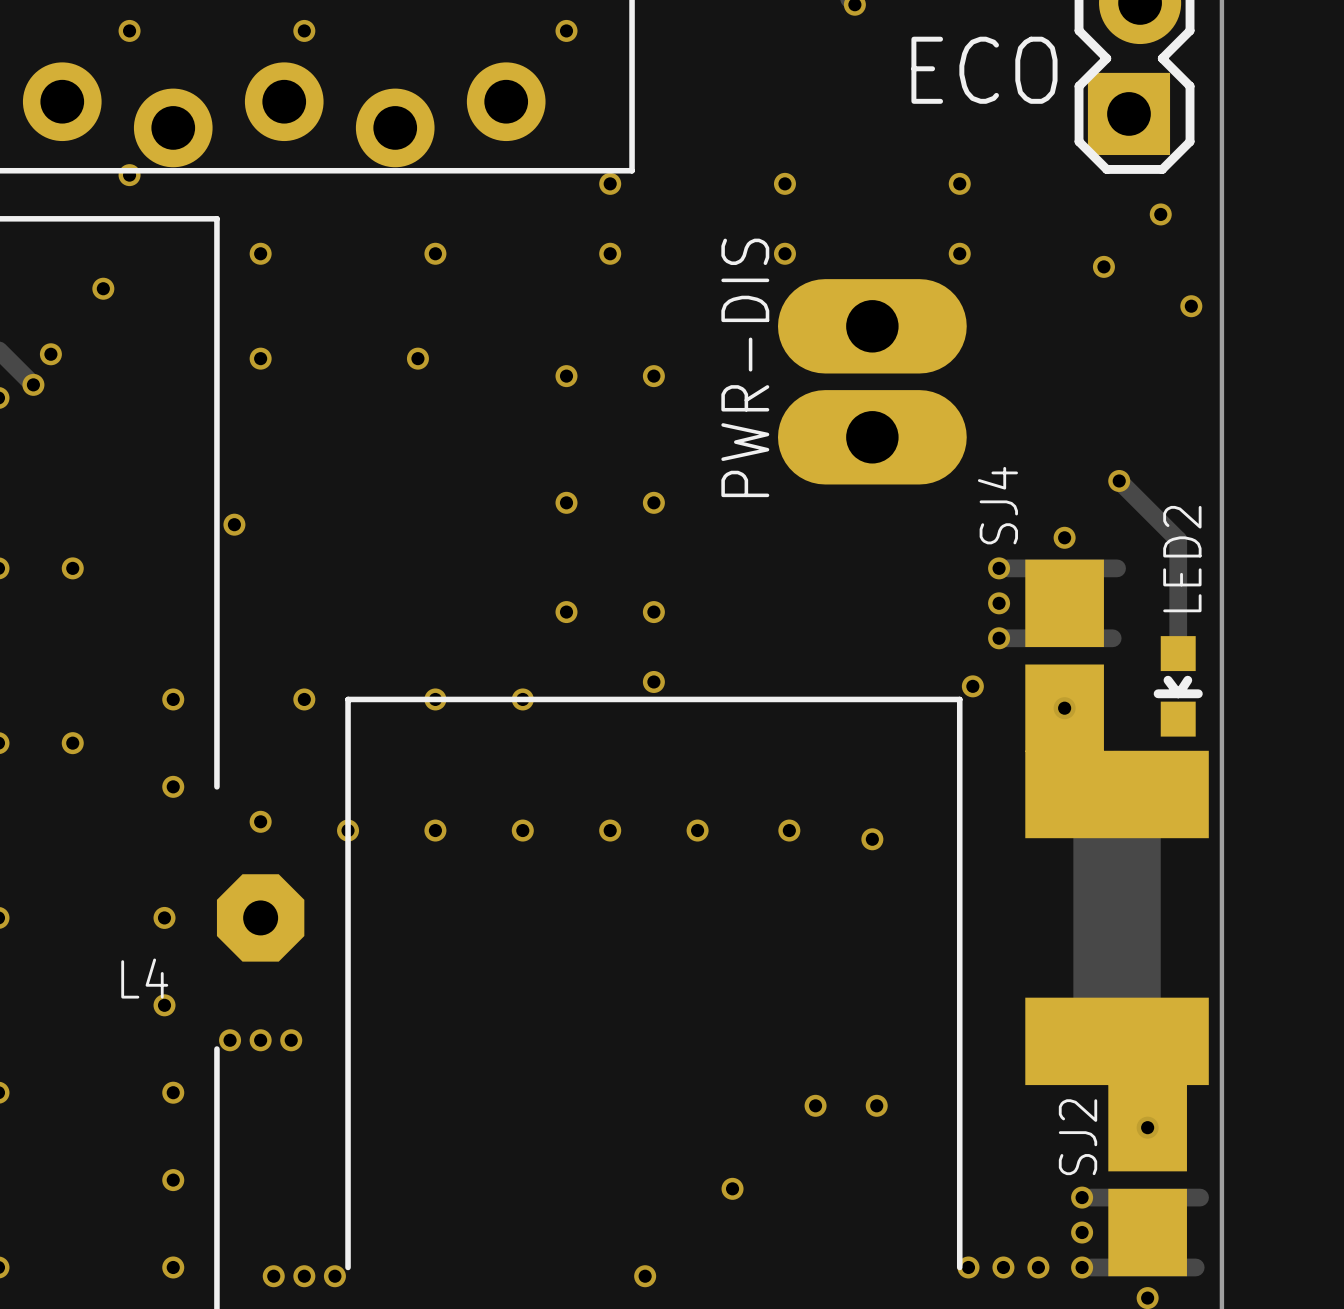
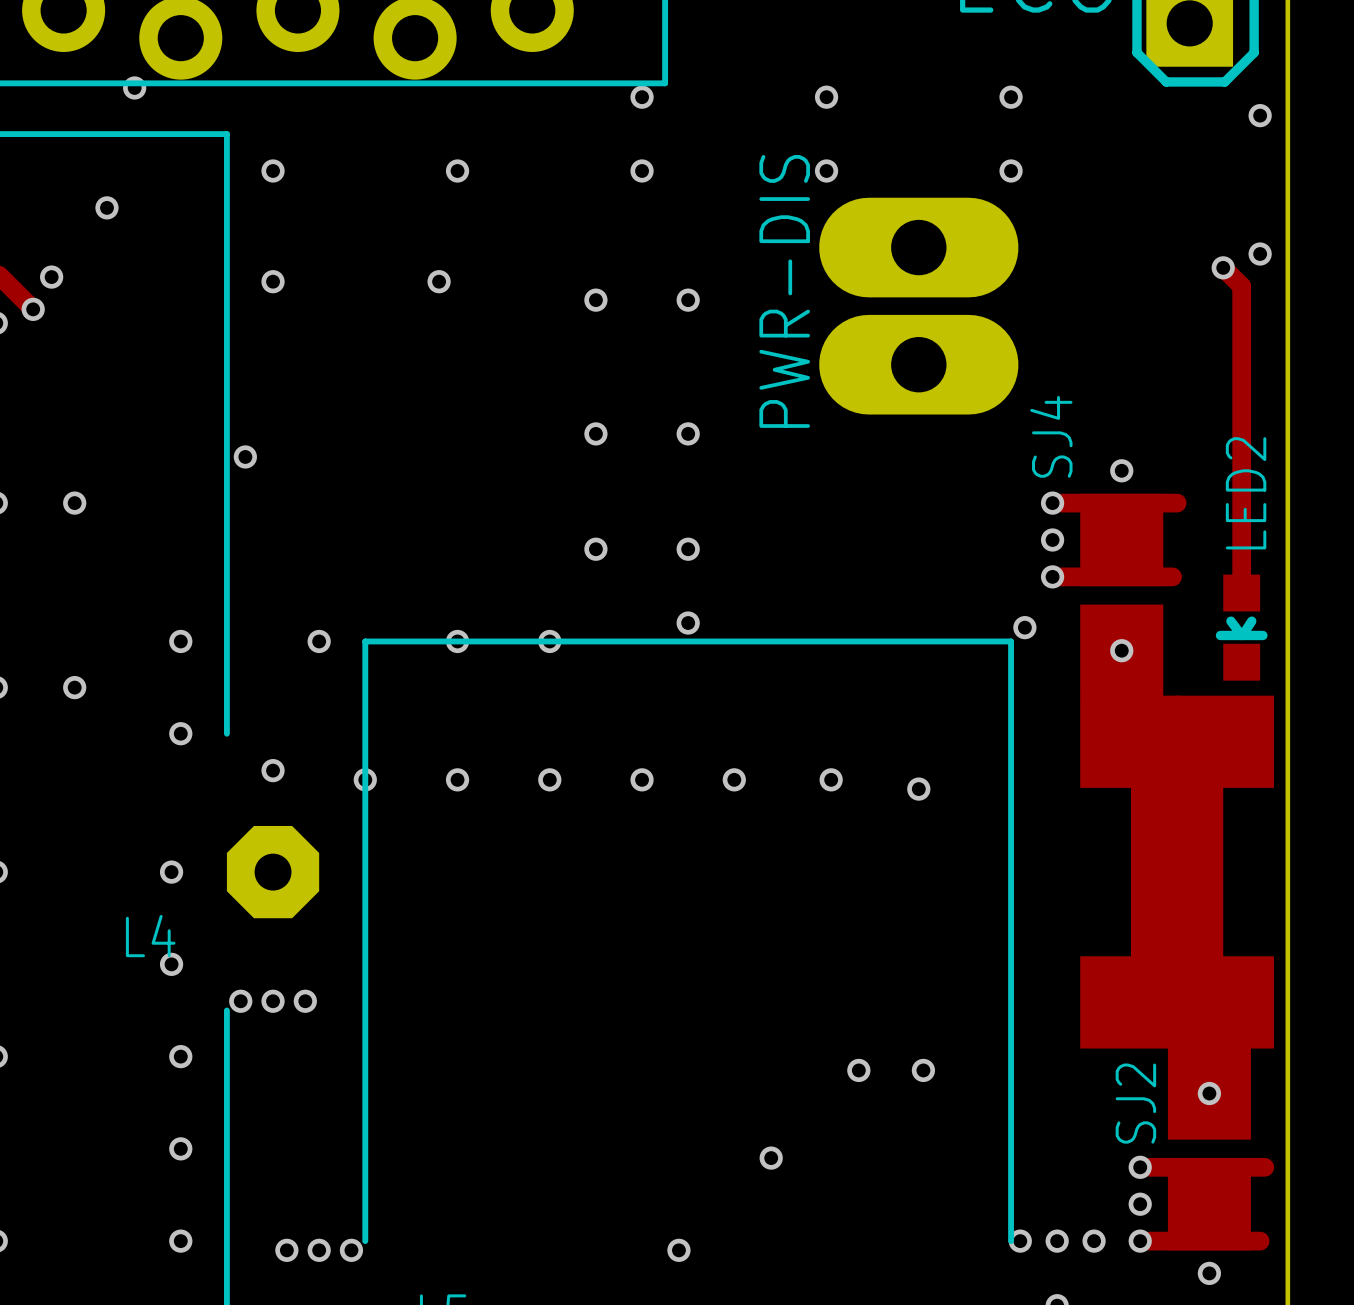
via position: (1160, 214) -> (1260, 115)
via: (1103, 266) -> none
via: (1191, 306) -> none
via: none -> (1260, 254)
via: none -> (1223, 267)
track: (1119, 480) (1178, 539) -> (1223, 267) (1241, 286) (1241, 473)
via: (1119, 480) -> none

